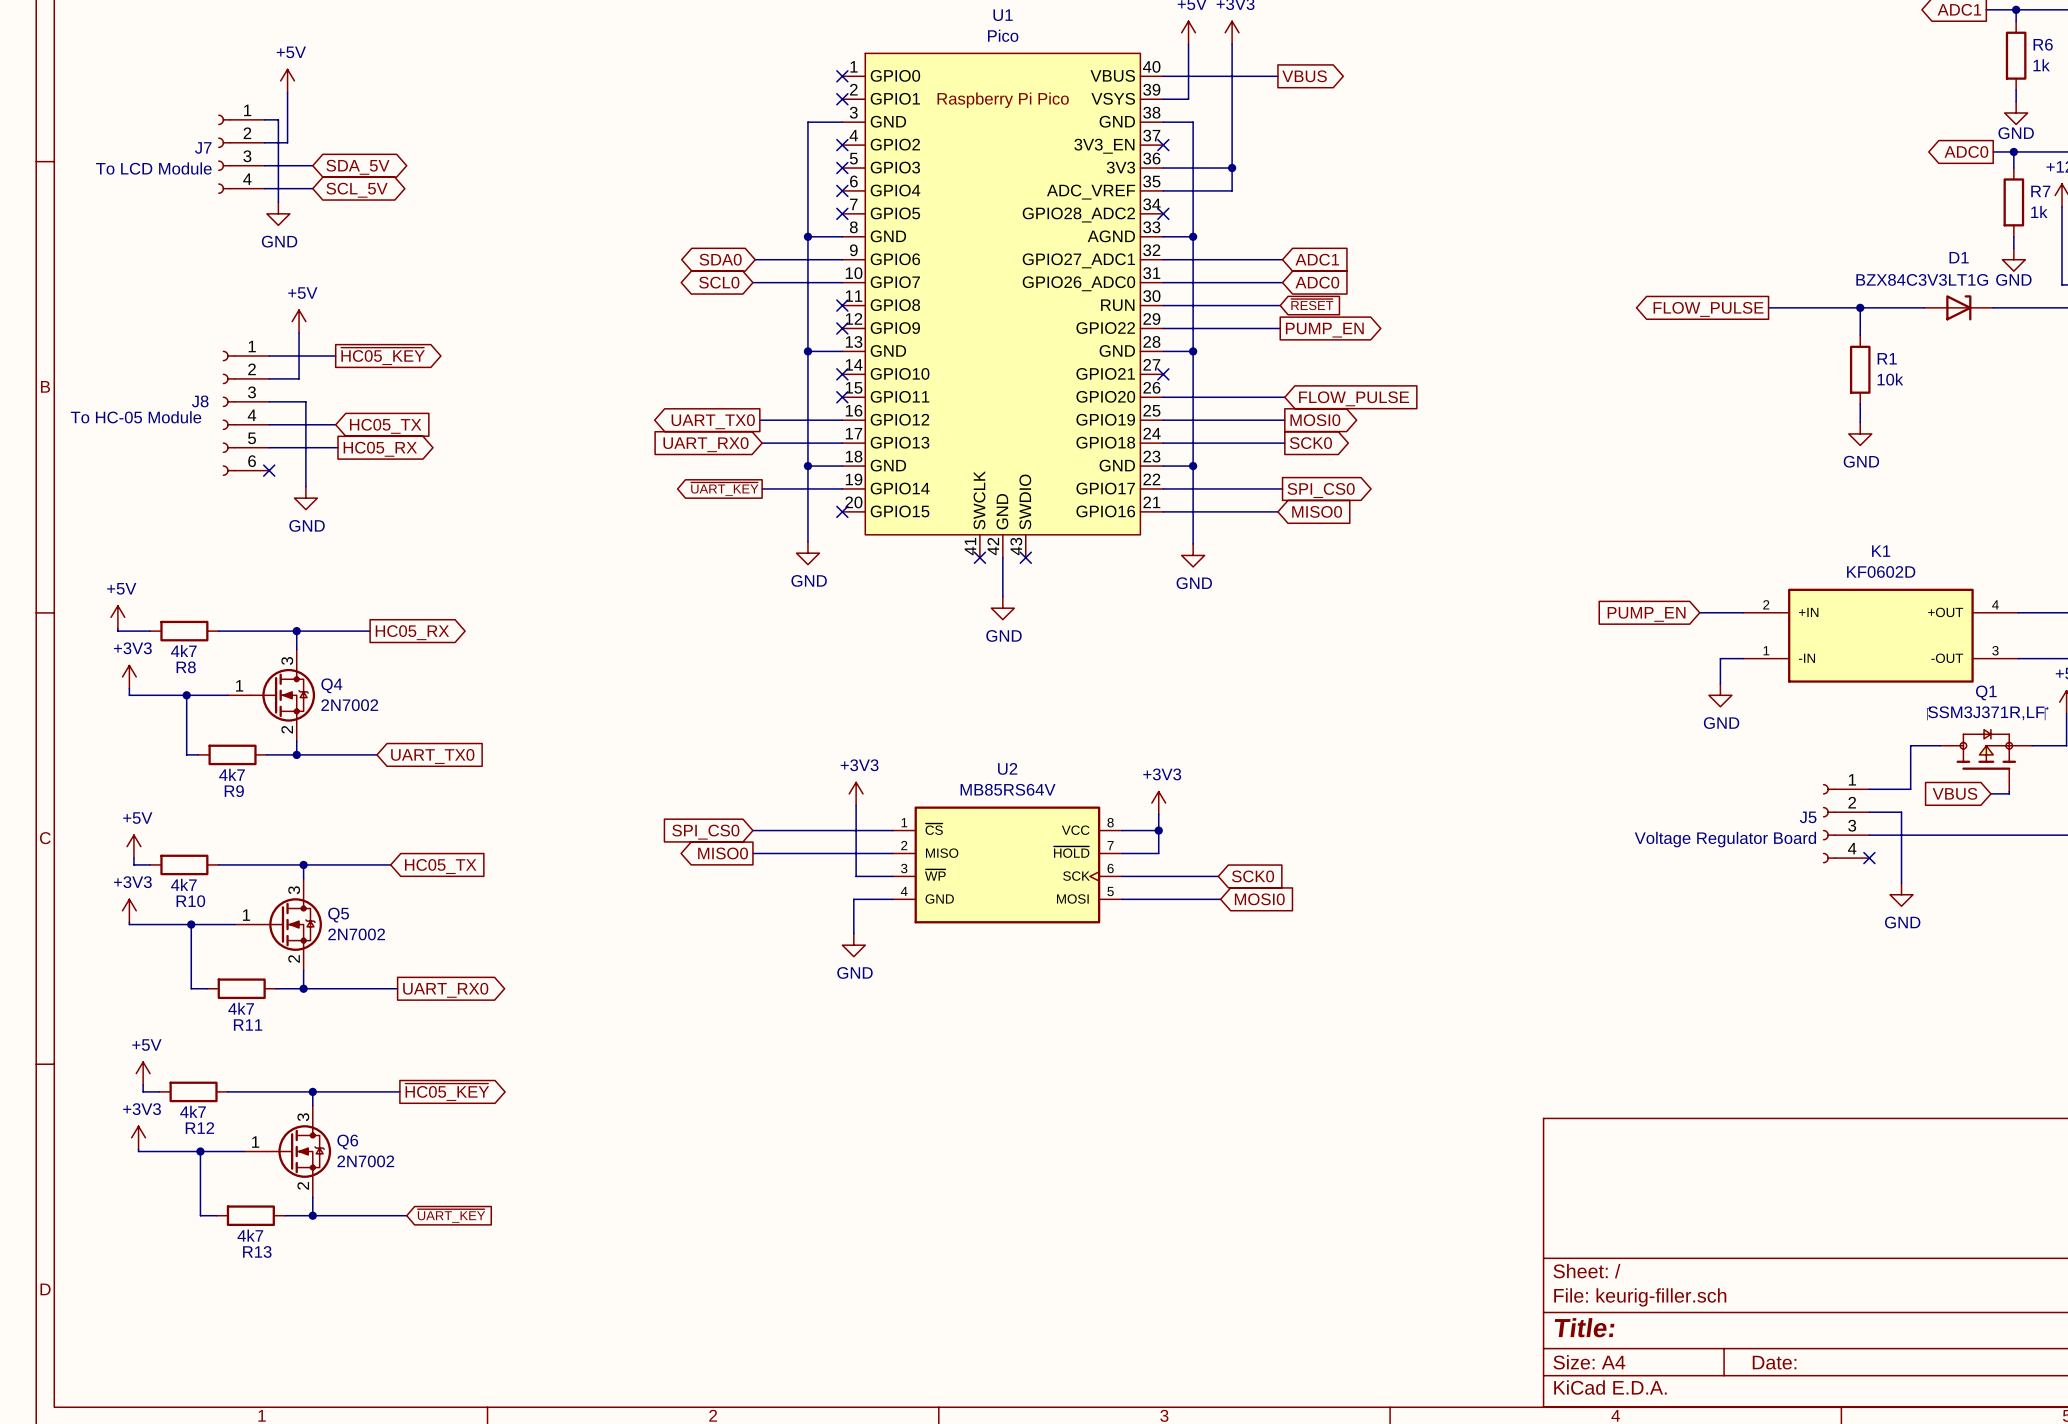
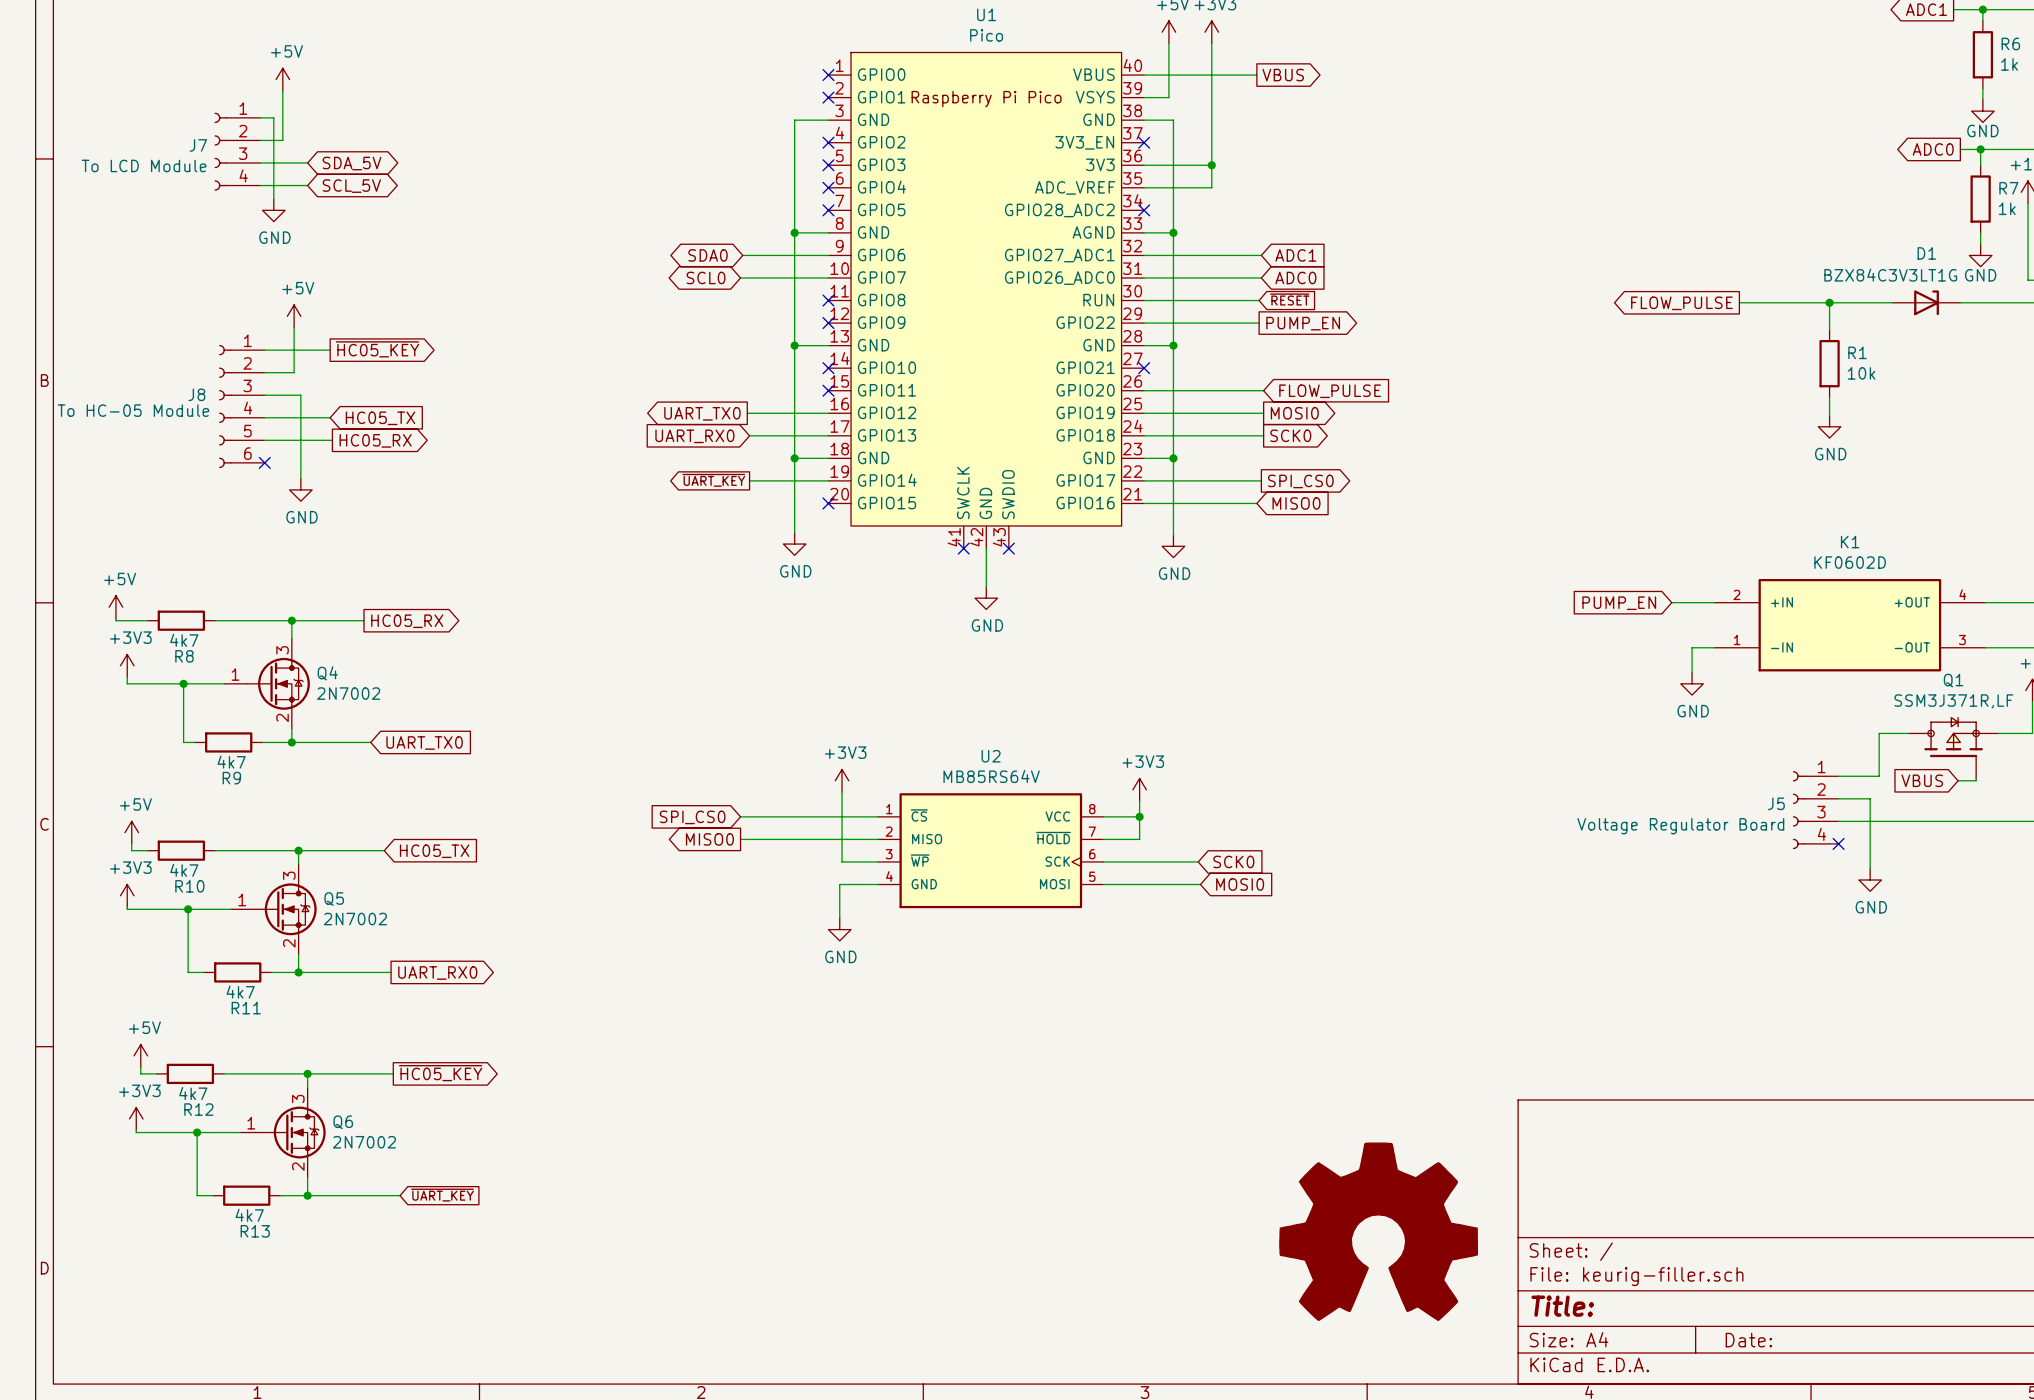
power symbol: none -> (1378, 1231)

